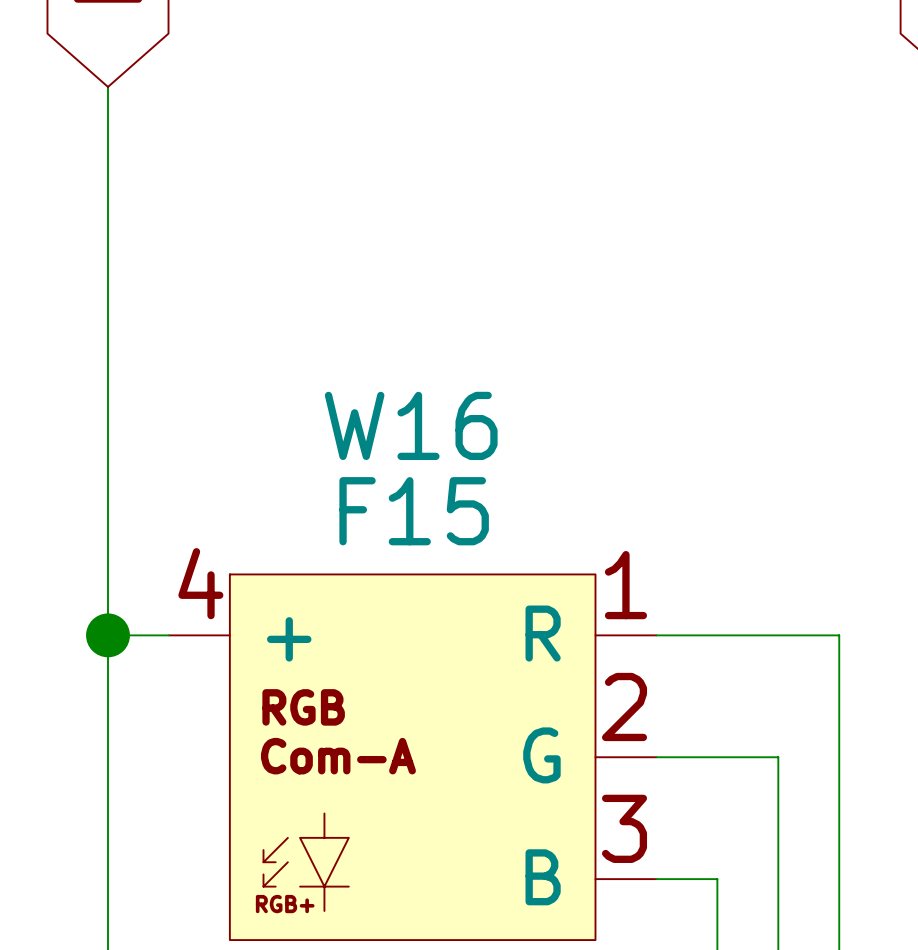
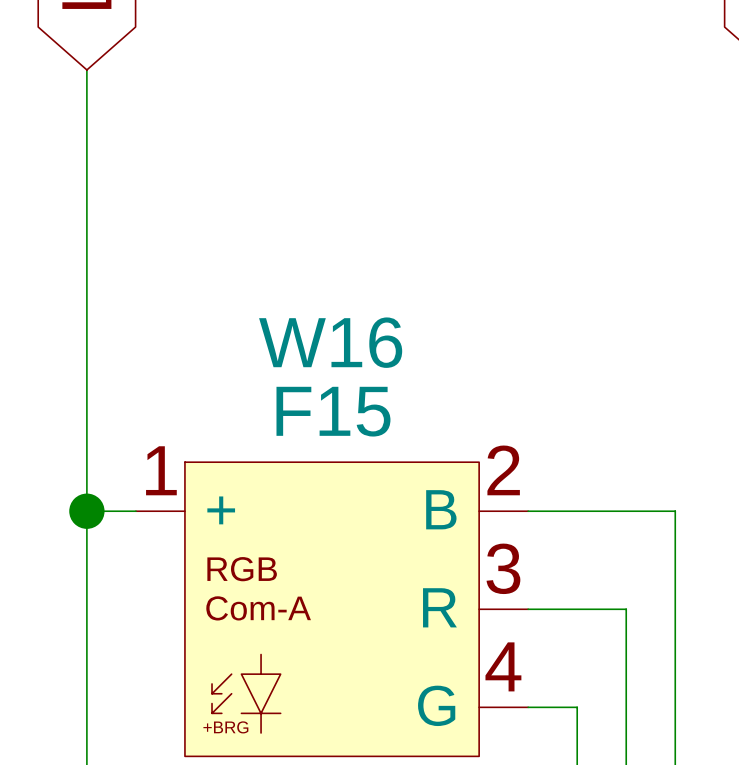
W16 pin number: 4 (200, 583) -> 1 (161, 470)
W16 pin number: 1 (625, 585) -> 2 (503, 470)
W16 pin name: R (543, 633) -> B (441, 509)
W16 pin number: 2 (624, 706) -> 3 (503, 568)
W16 pin name: G (541, 755) -> R (439, 607)
W16 pin number: 3 (624, 828) -> 4 (503, 666)
W16 pin name: B (543, 877) -> G (436, 705)
W16 text: RGB+ (285, 904) -> +BRG (225, 727)

